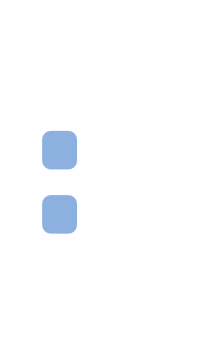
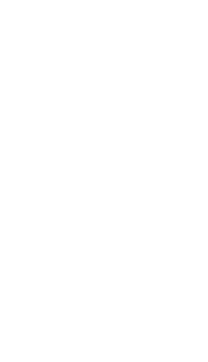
part: (59, 182) -> none

